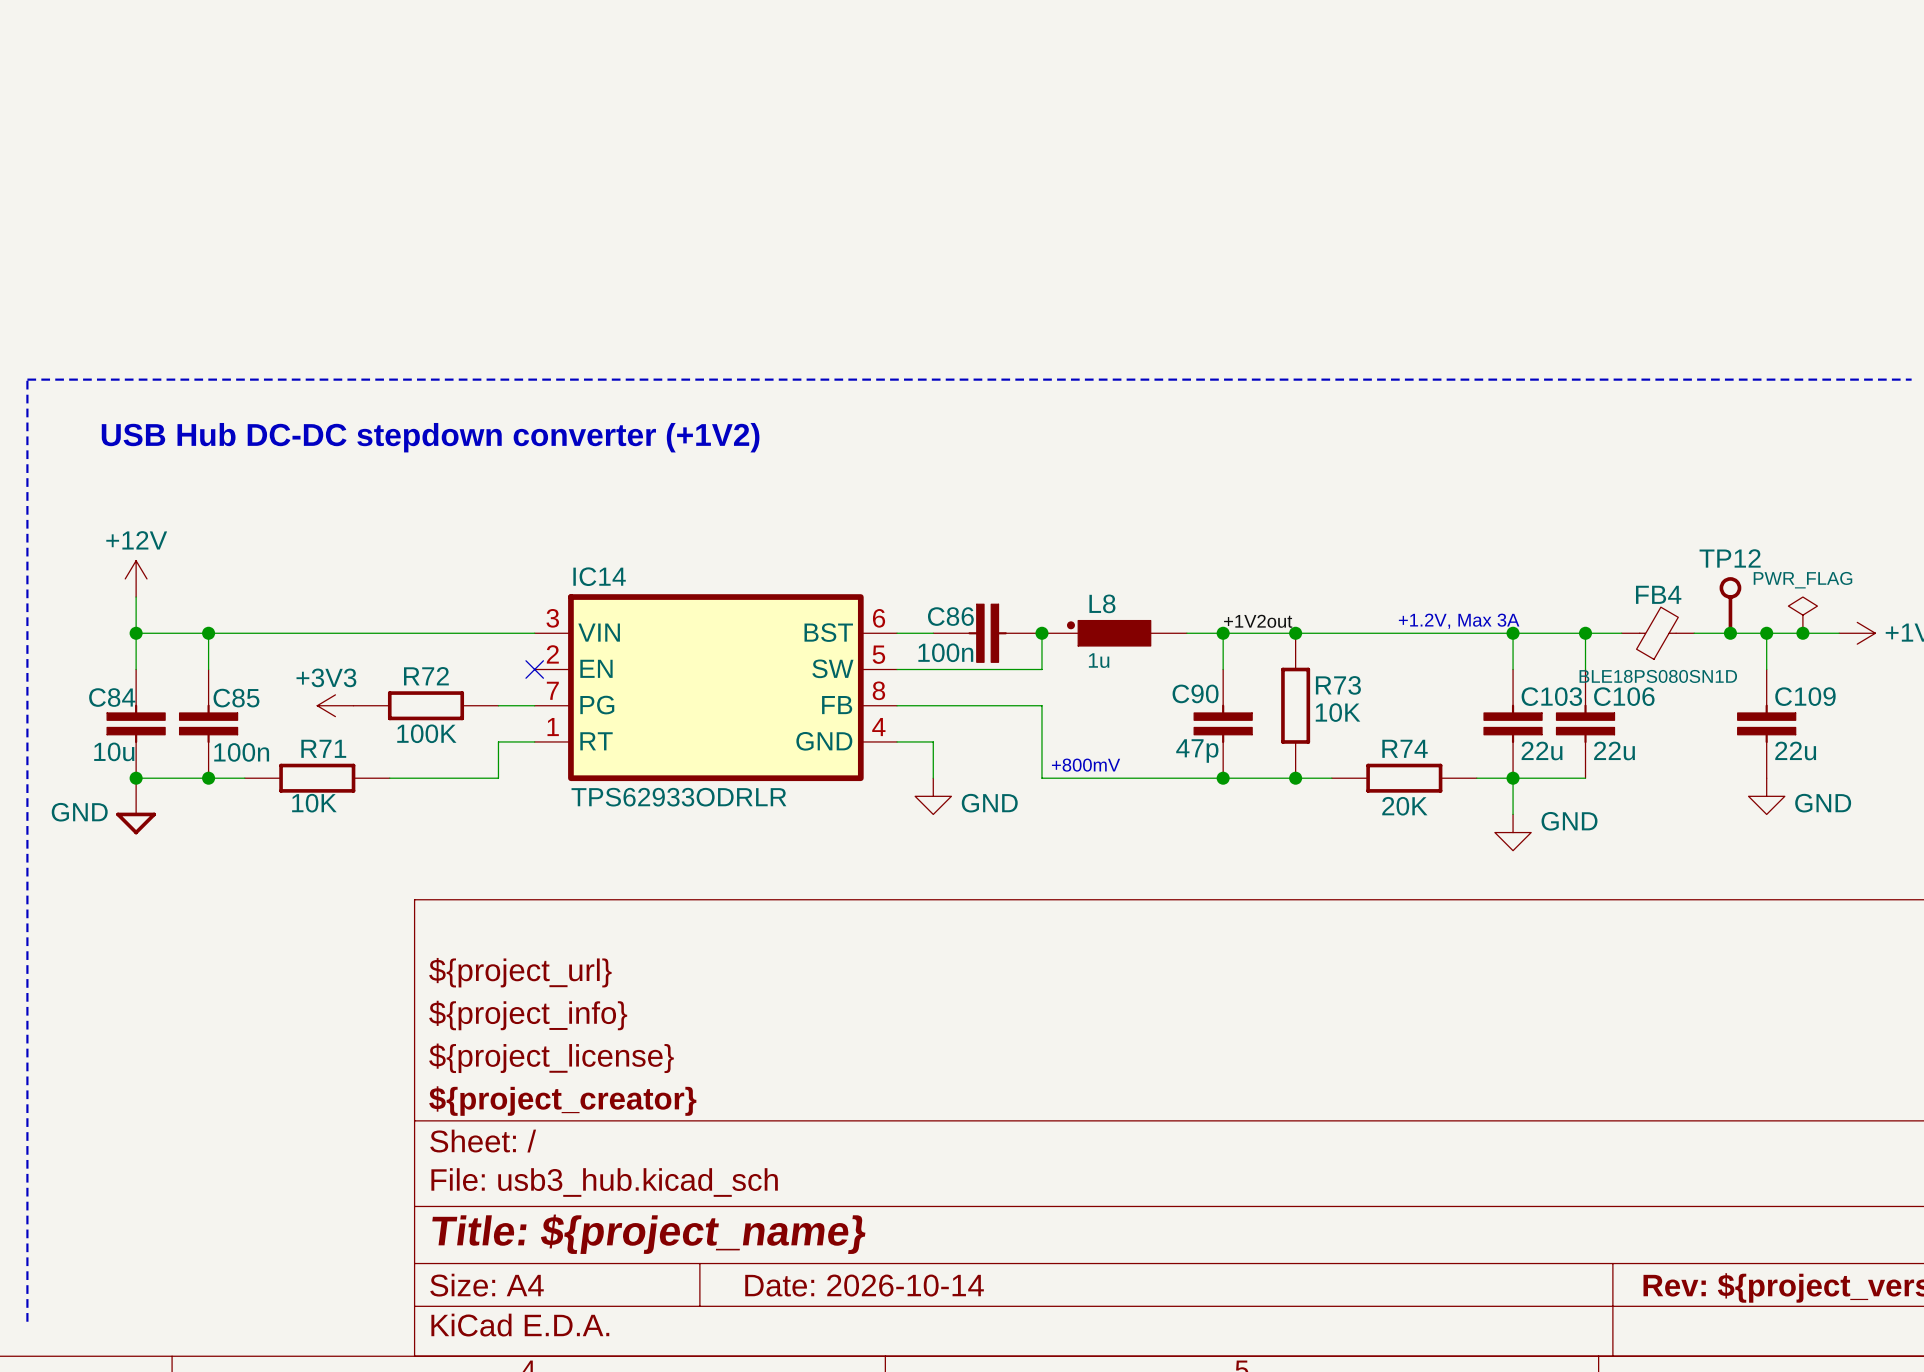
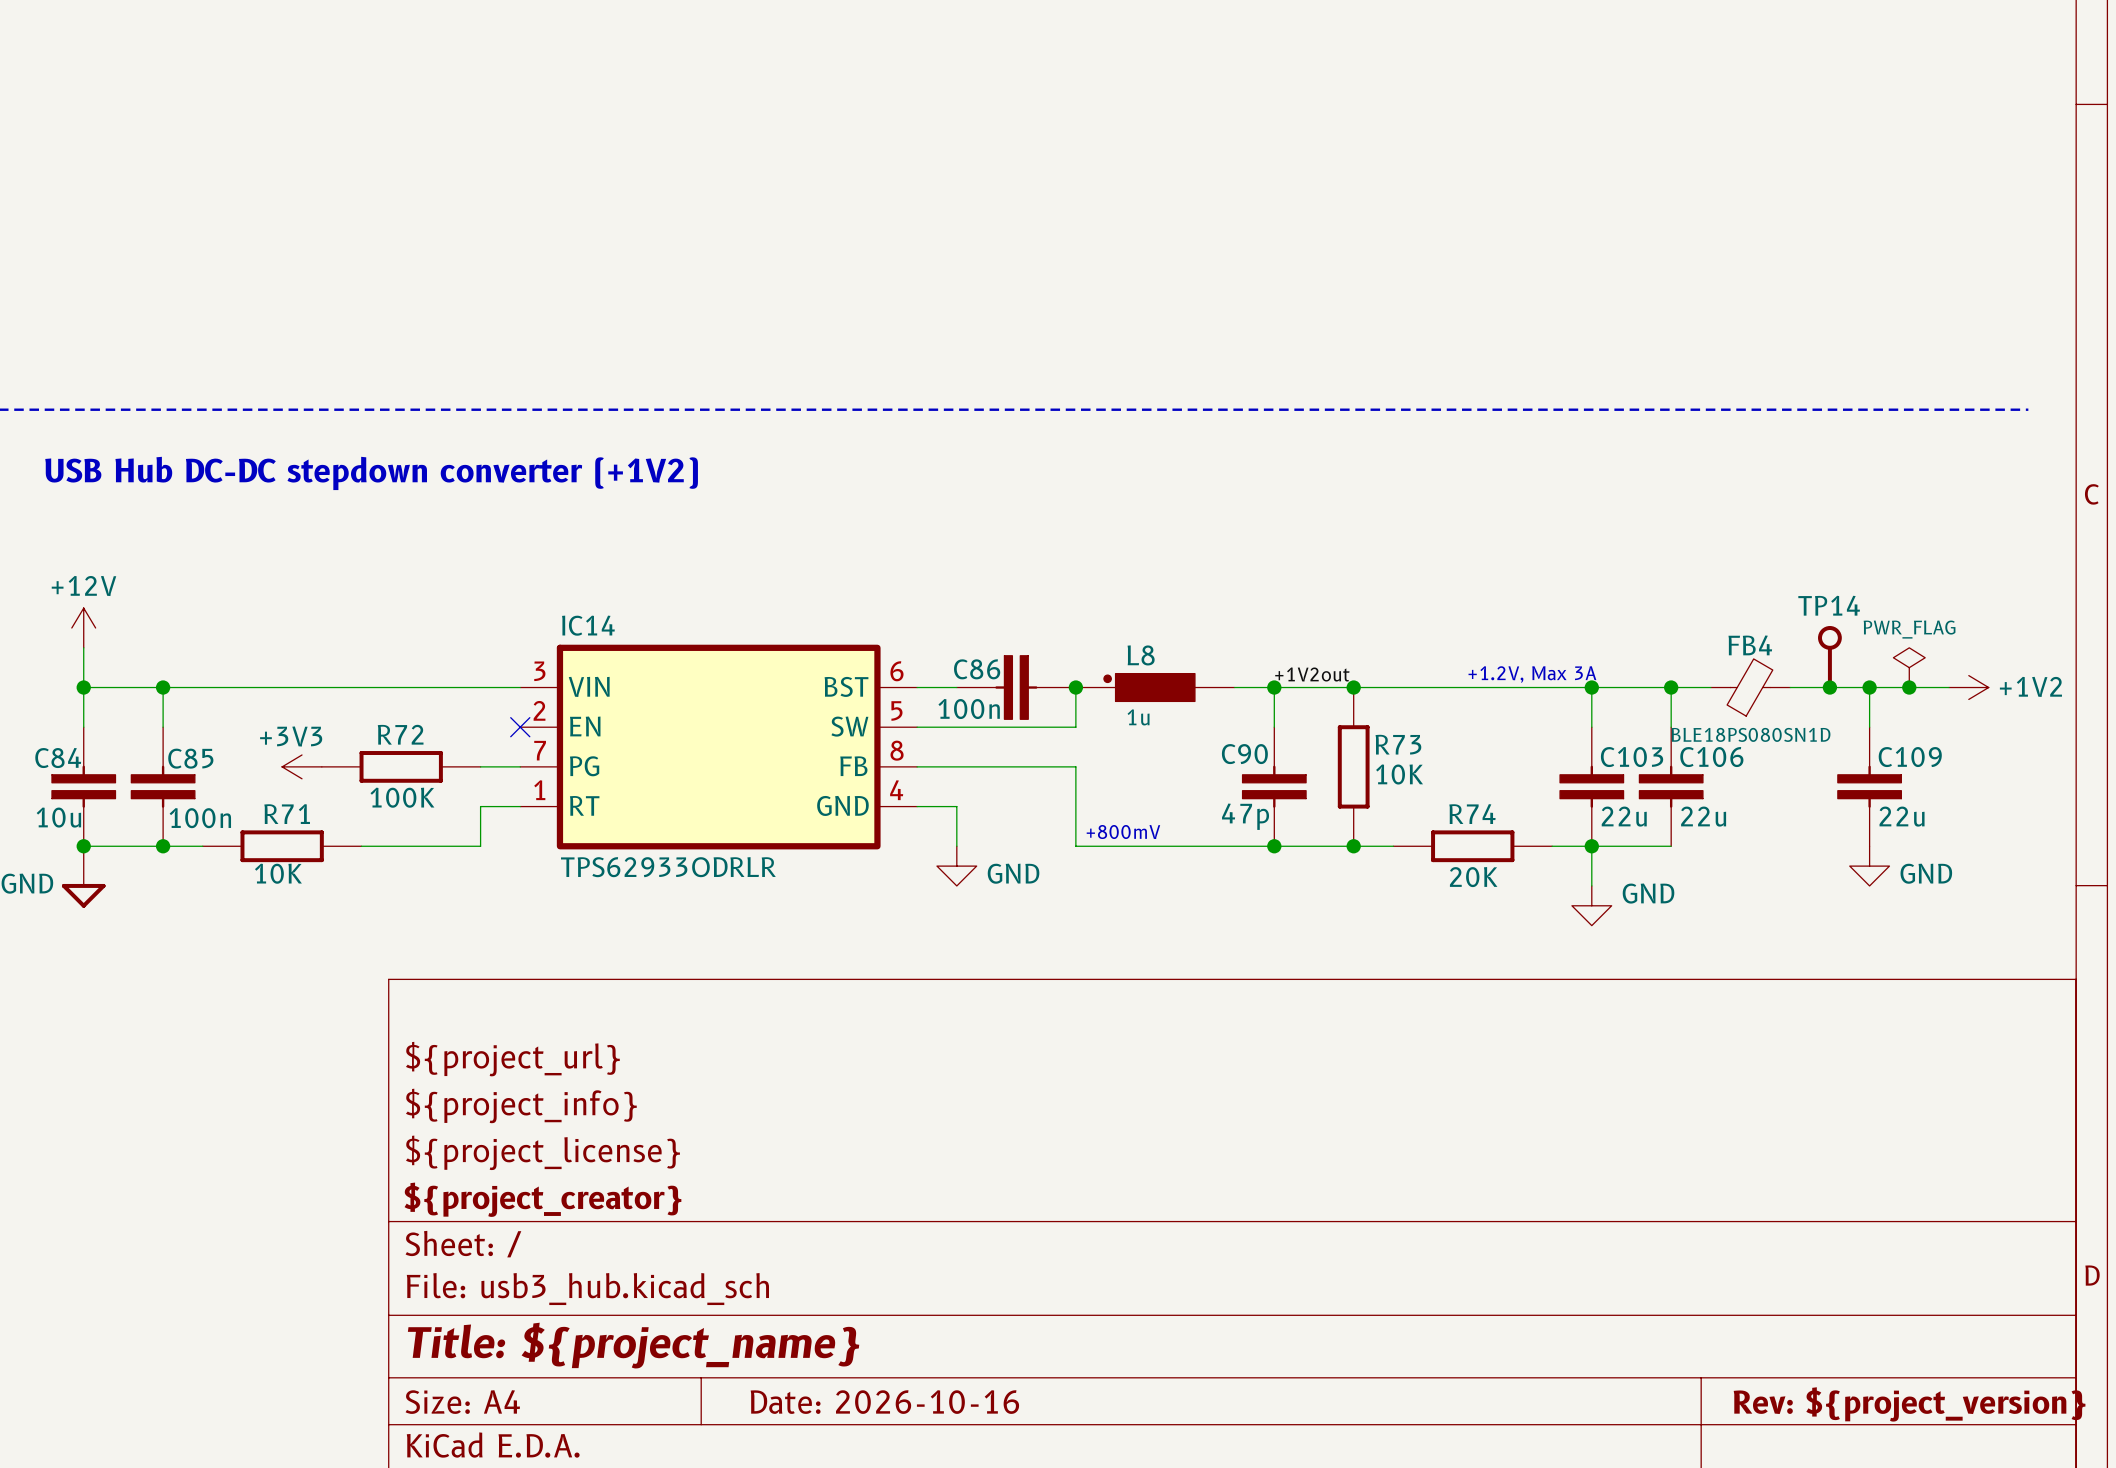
TP12 name: TP12 (1730, 558) -> TP14 (1829, 605)
title block: Date: 2026-10-14 (864, 1285) -> Date: 2026-10-16 (884, 1402)

